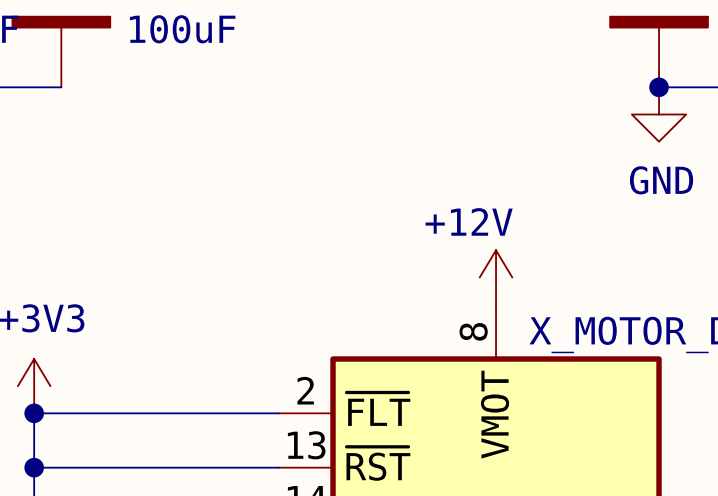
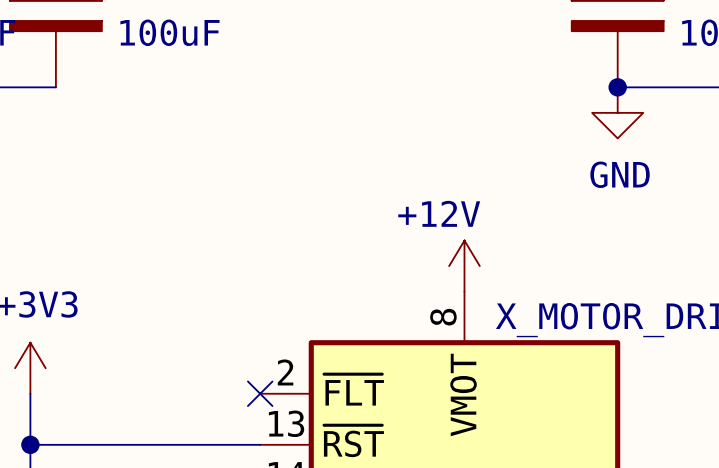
wire: (34, 413) (278, 413) -> none
junction: (34, 413) -> none
no-connect mark: none -> (260, 393)

